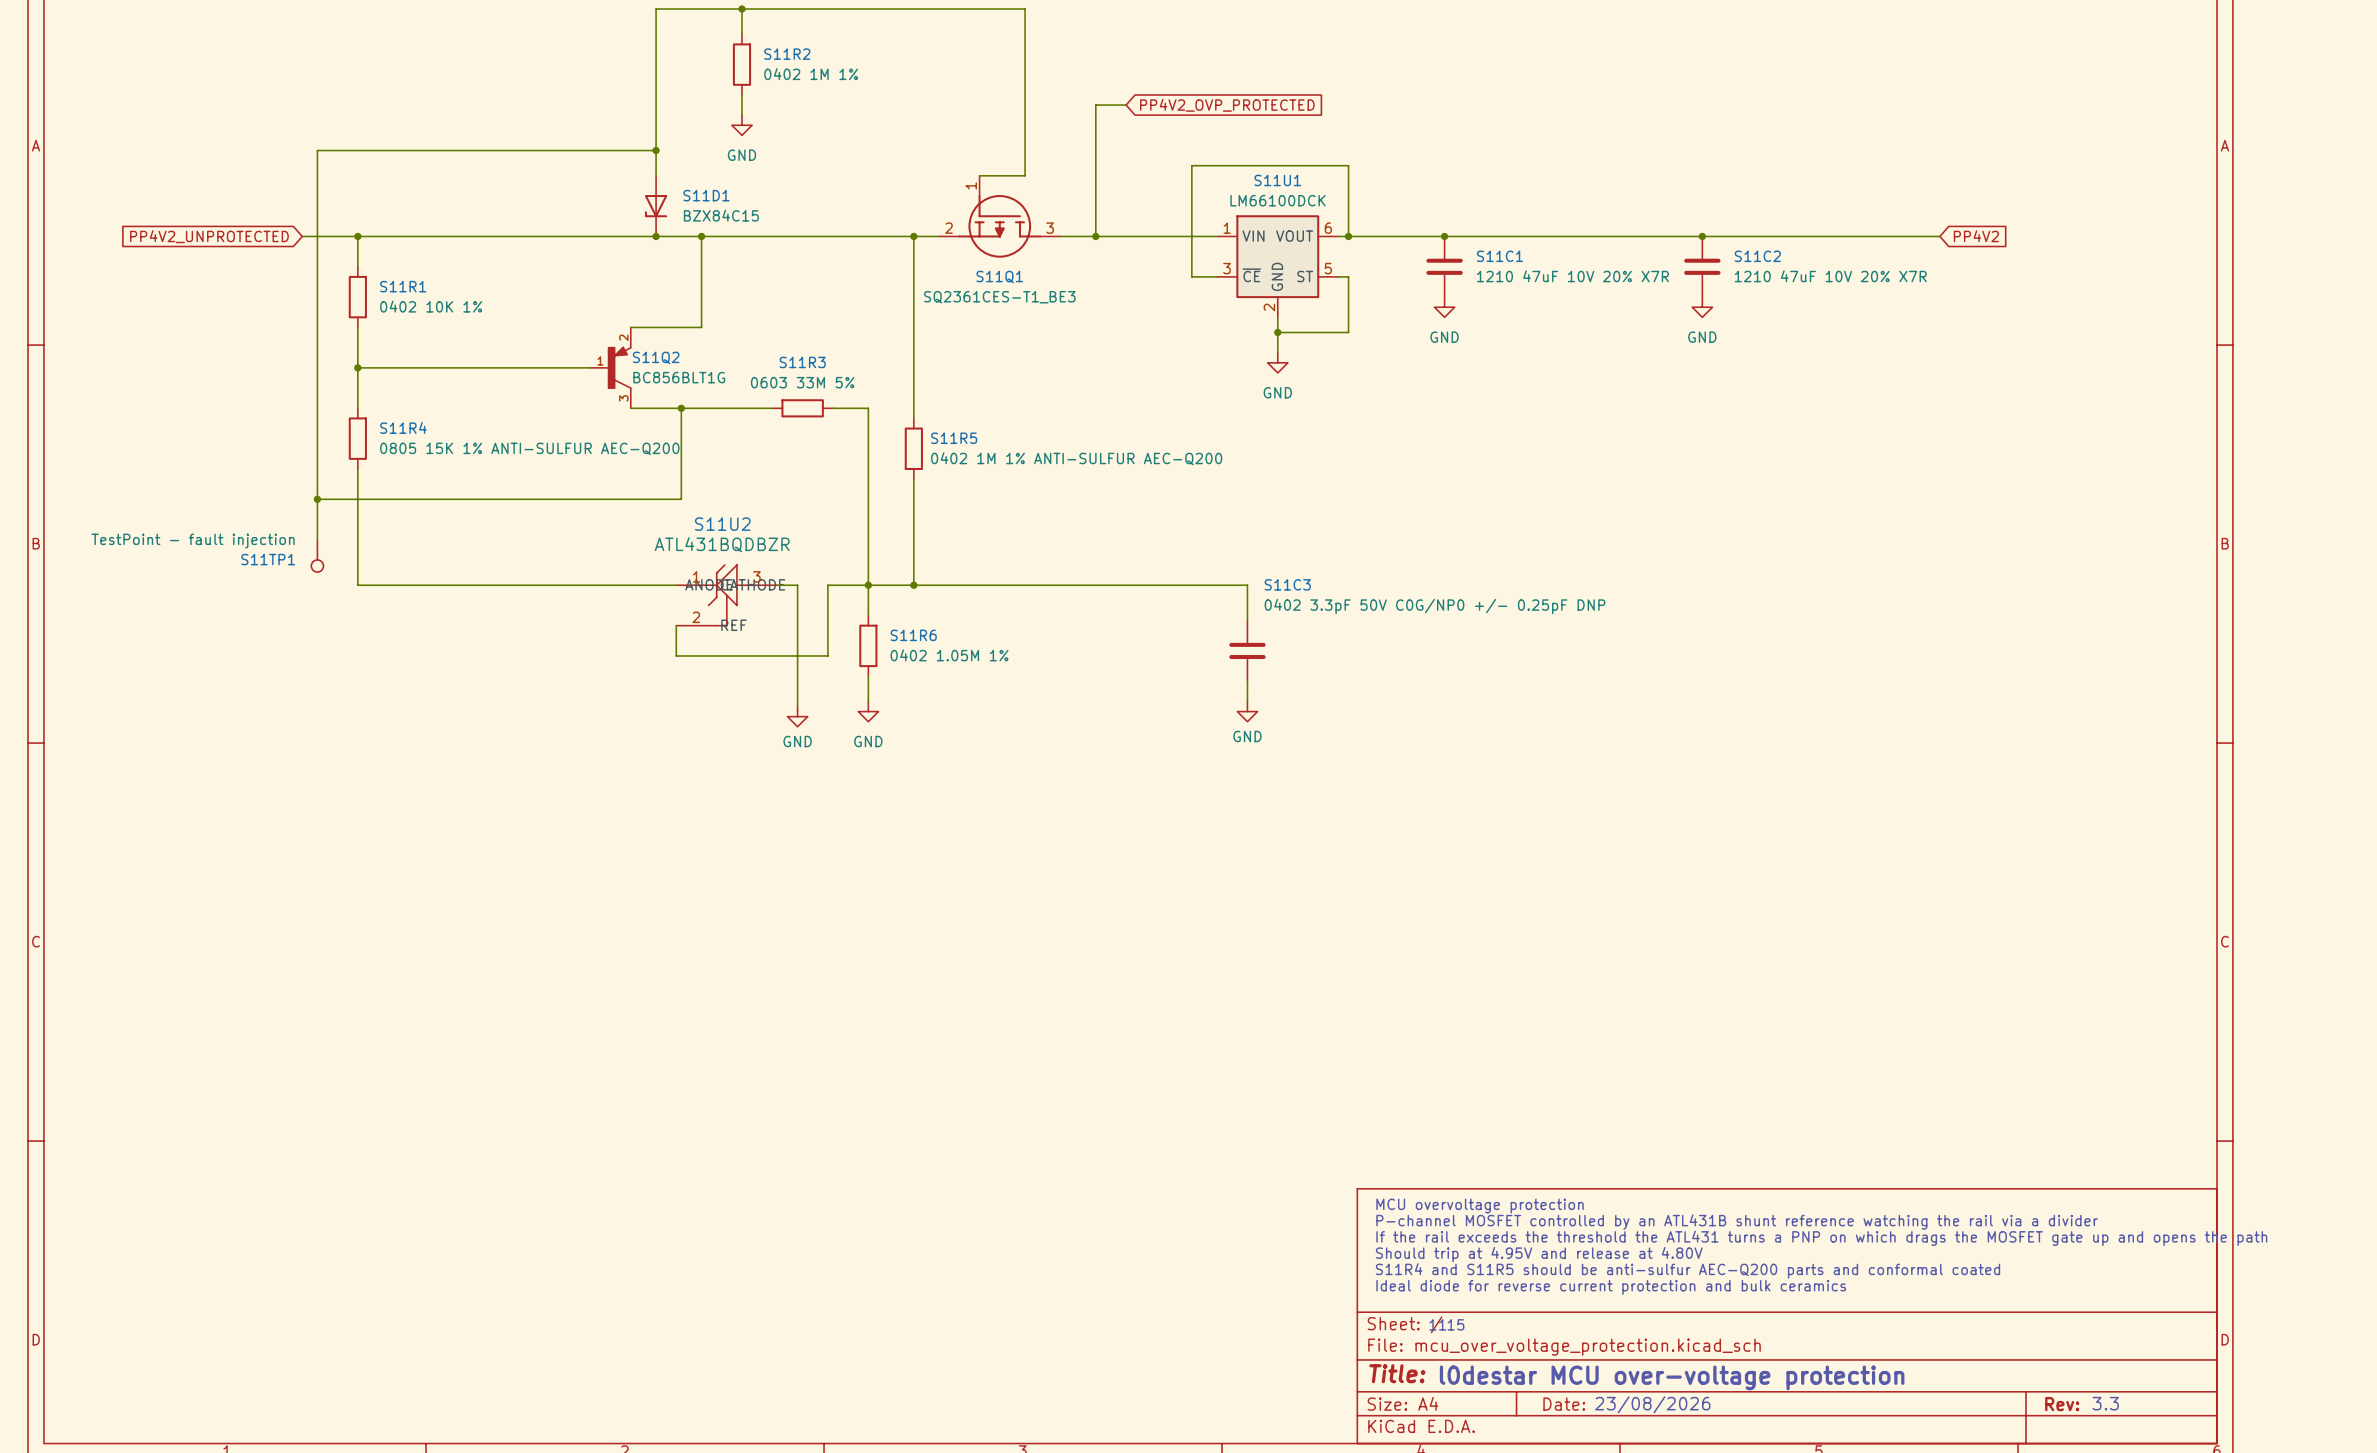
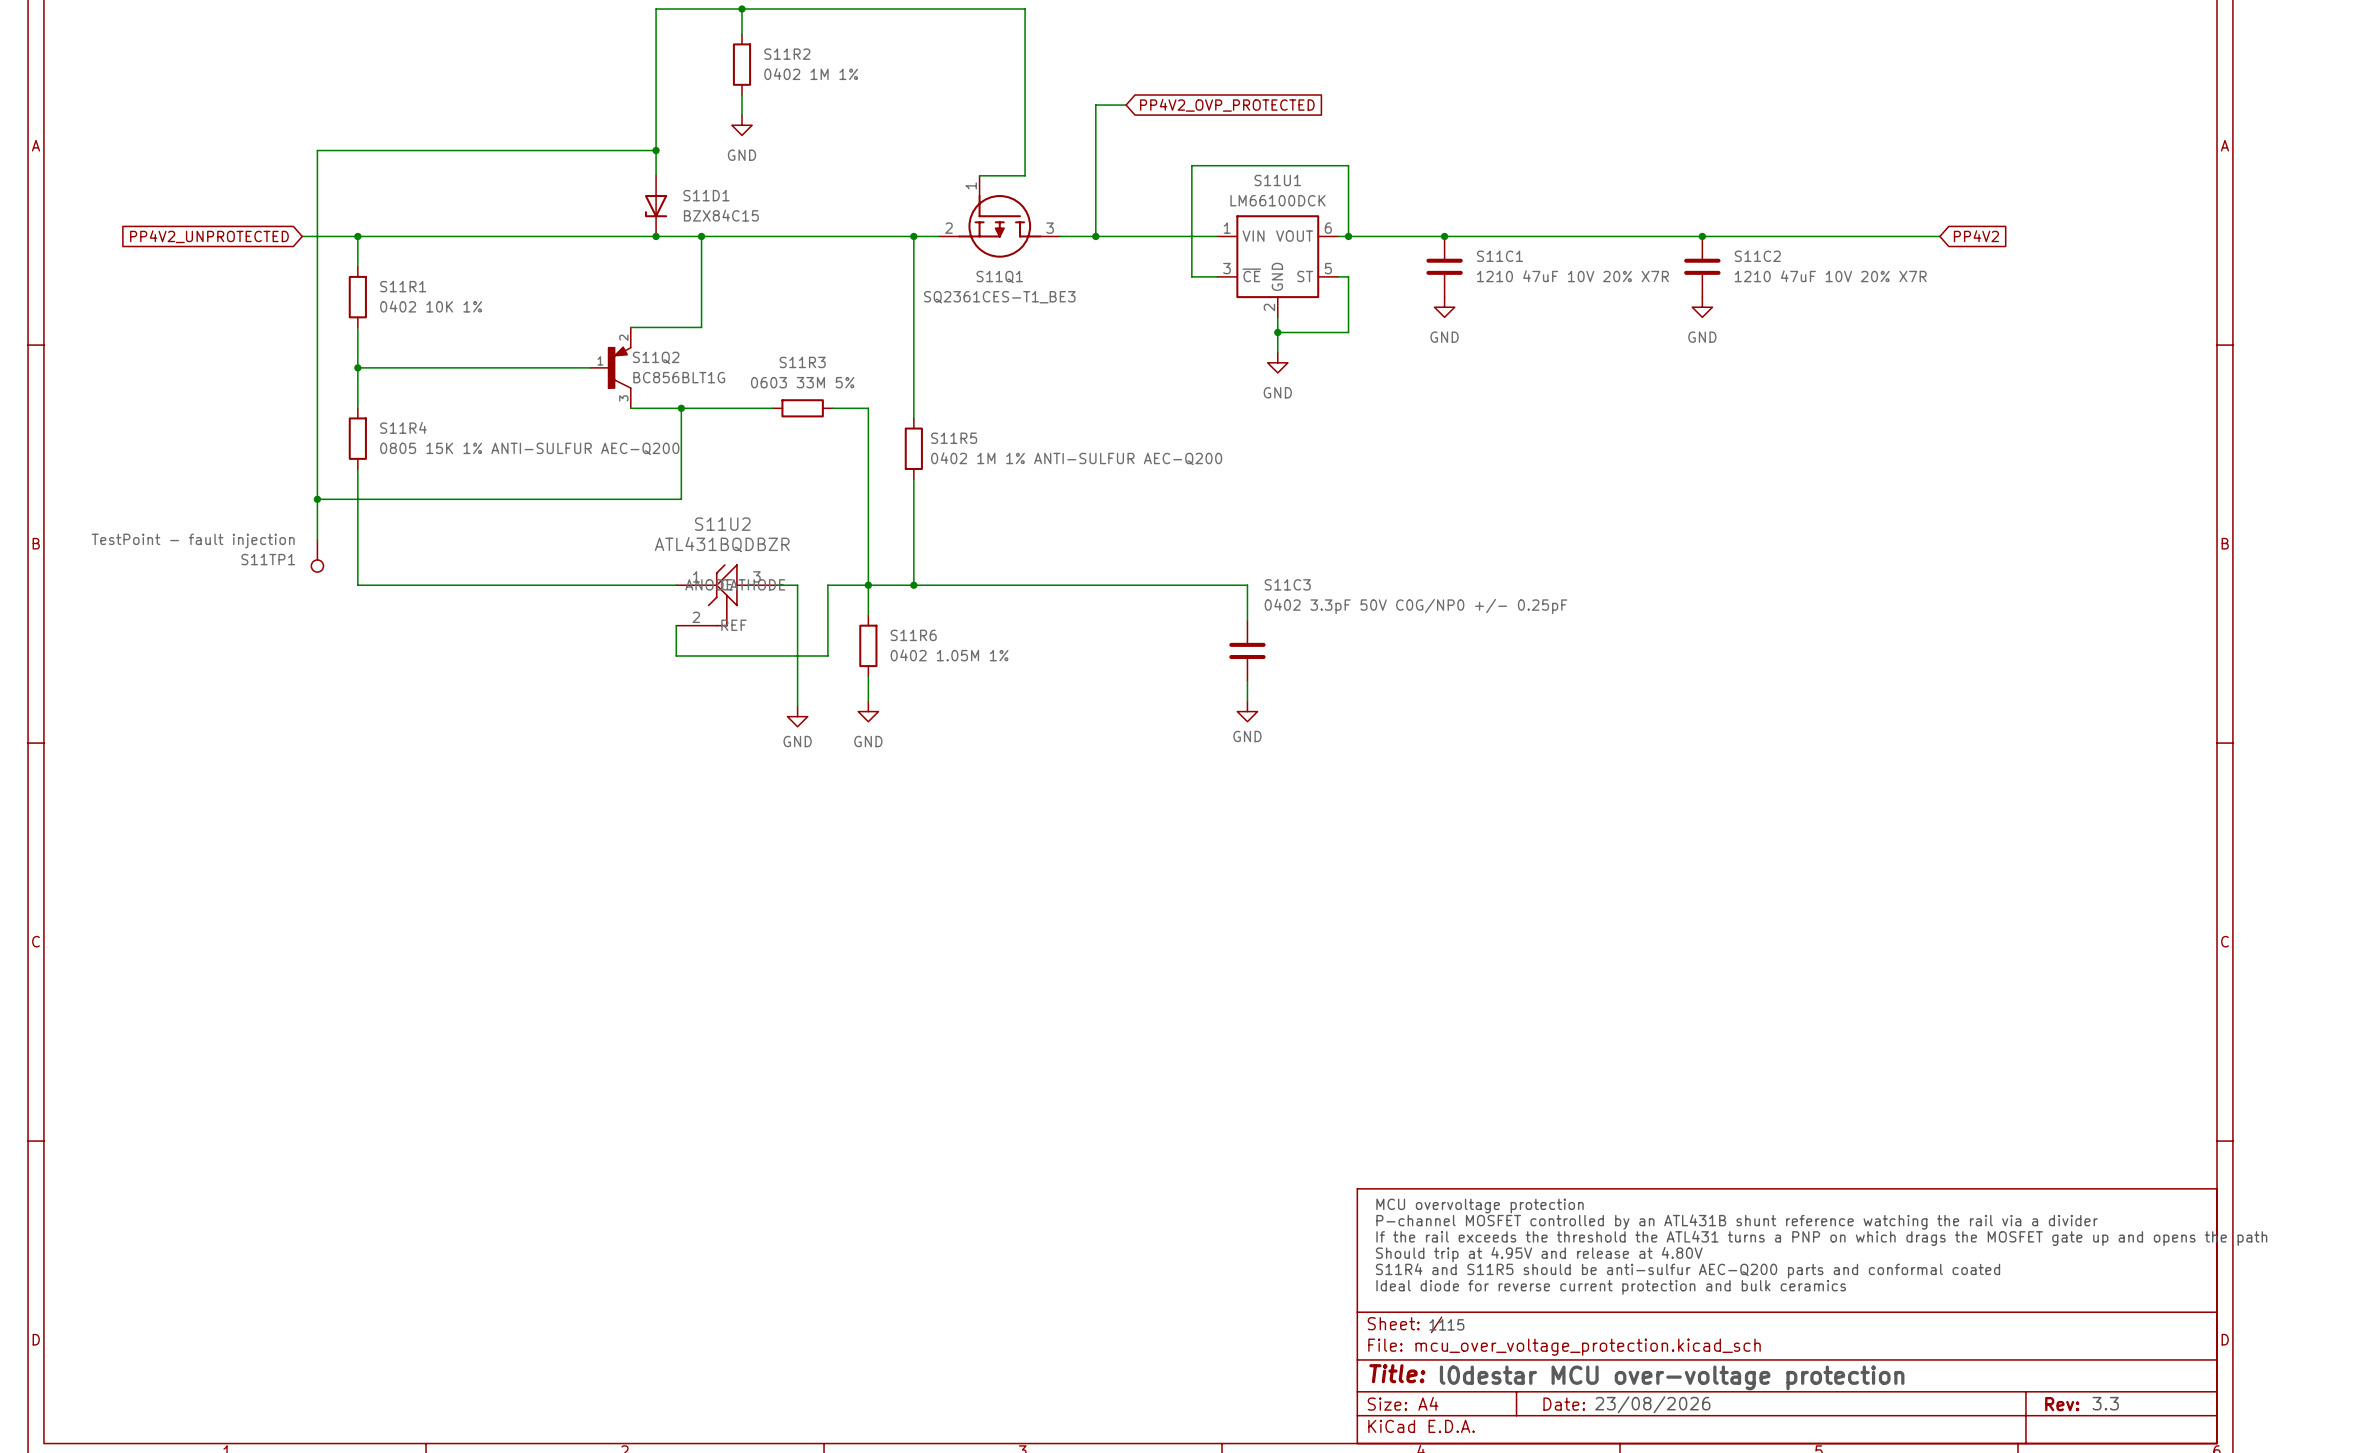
S11C3 value: 0402 3.3pF 50V C0G/NP0 +/- 0.25pF DNP (1435, 606) -> 0402 3.3pF 50V C0G/NP0 +/- 0.25pF (1416, 606)

